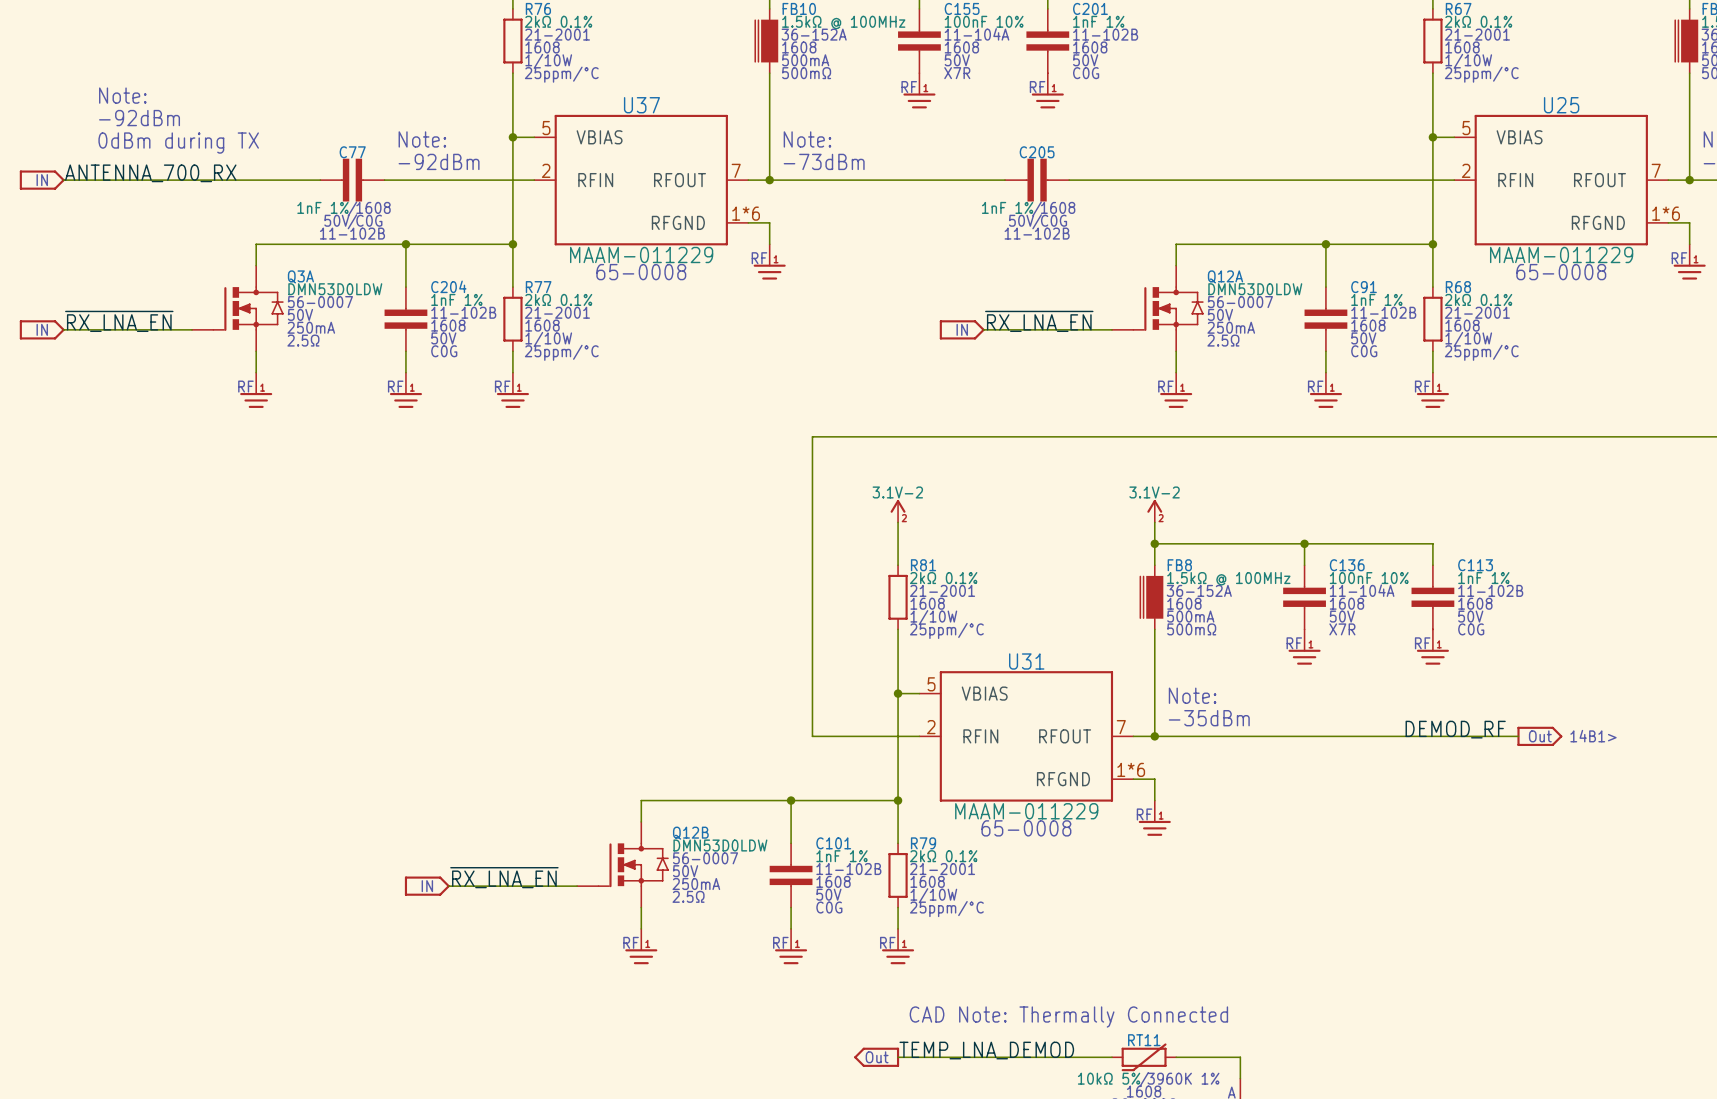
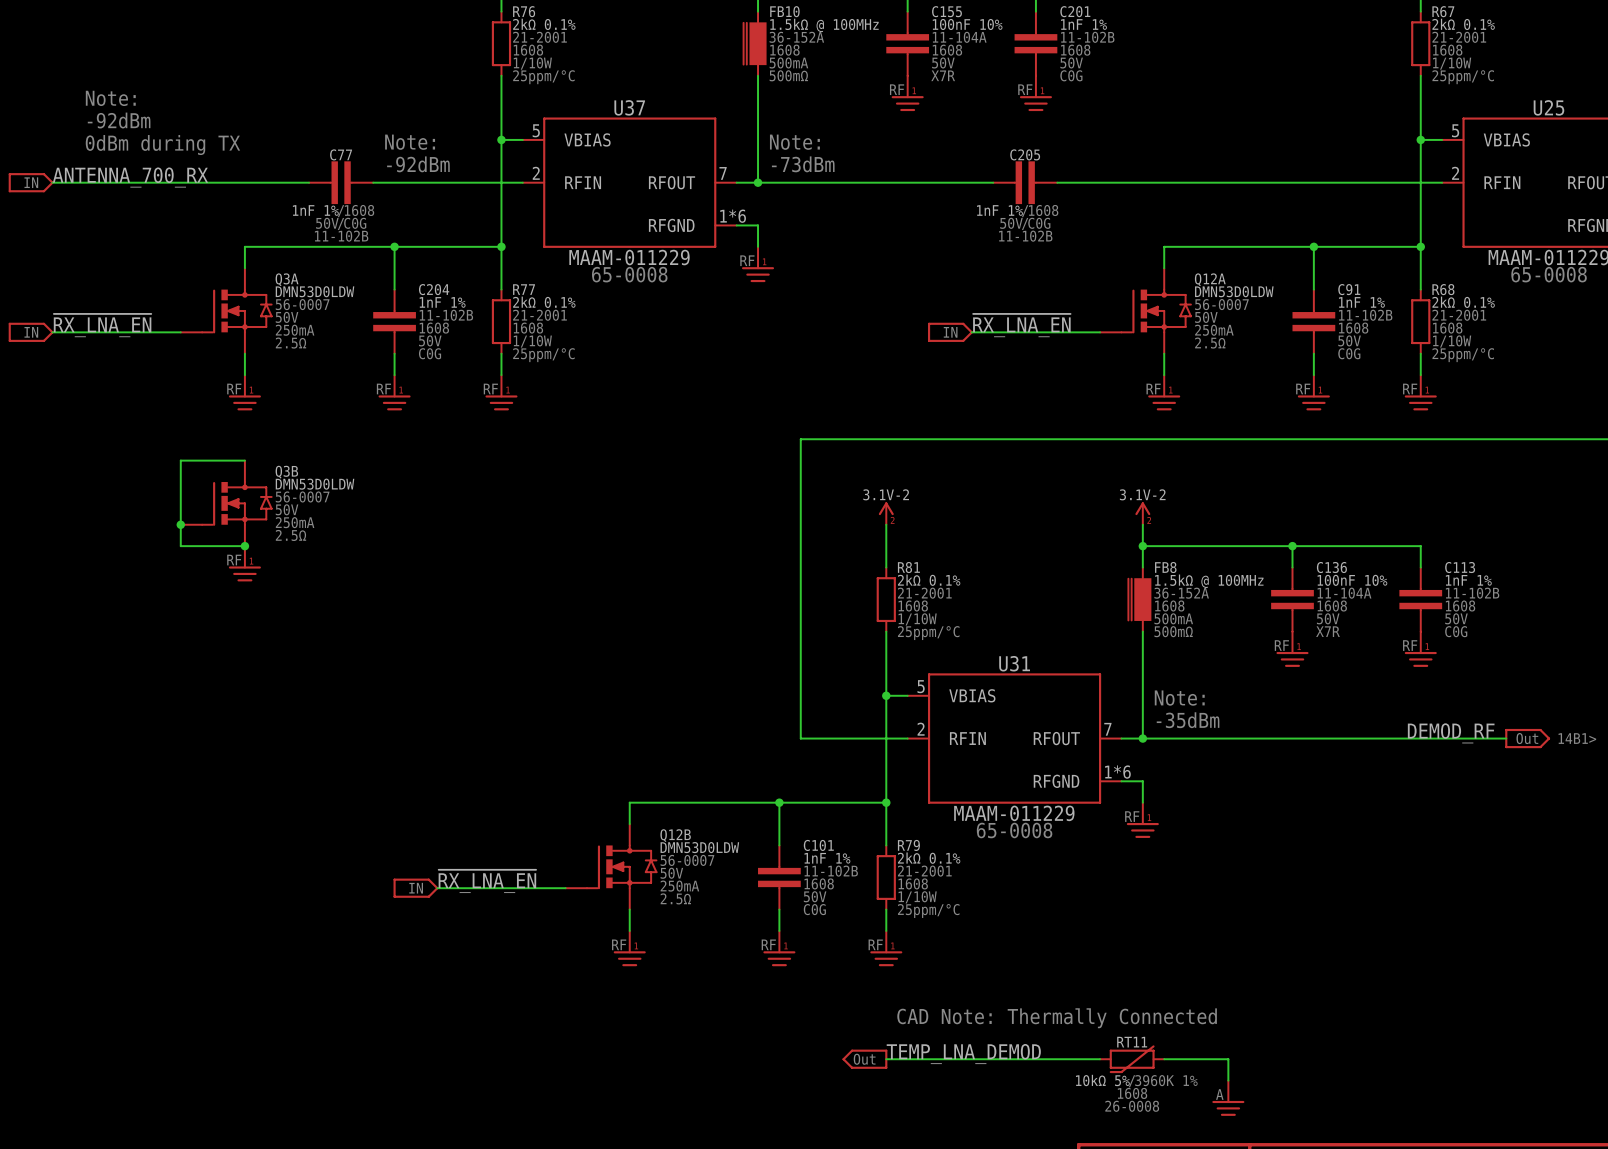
wire: none -> (244, 460) (180, 460) (180, 546) (244, 546)
Q3B: none -> DMN53D0LDW (226, 503)
junction: none -> (180, 524)
junction: none -> (244, 546)
power symbol: none -> (244, 563)

